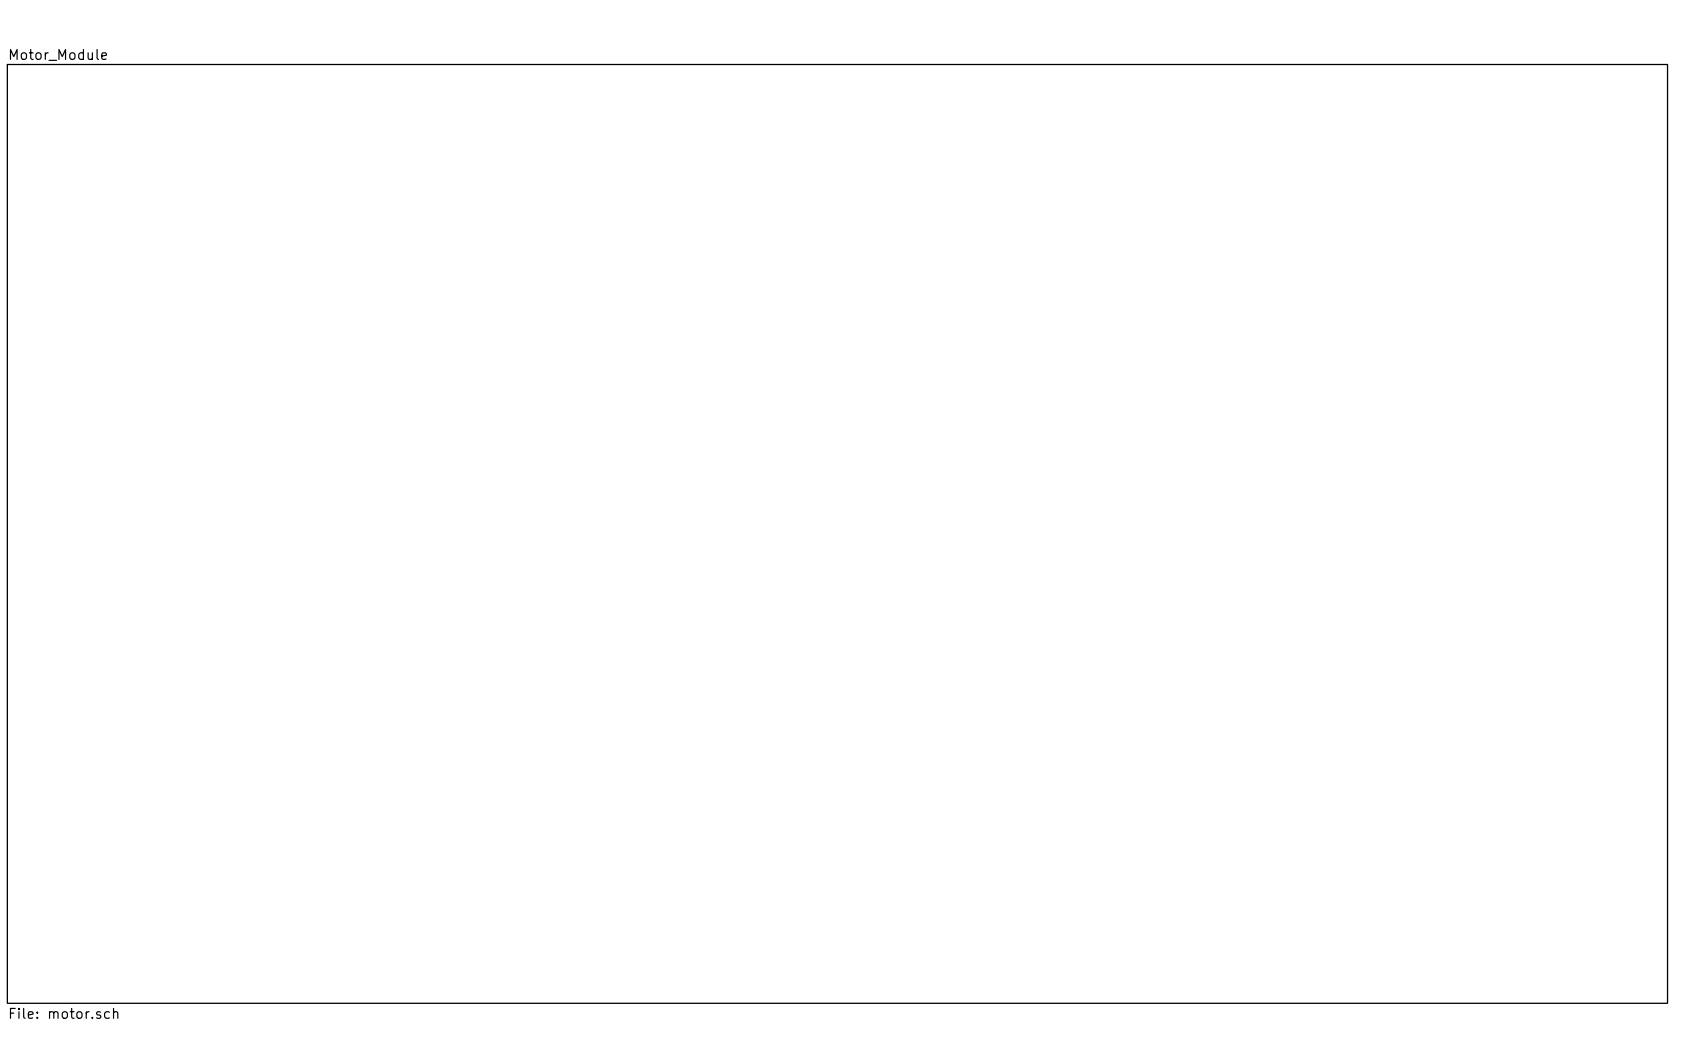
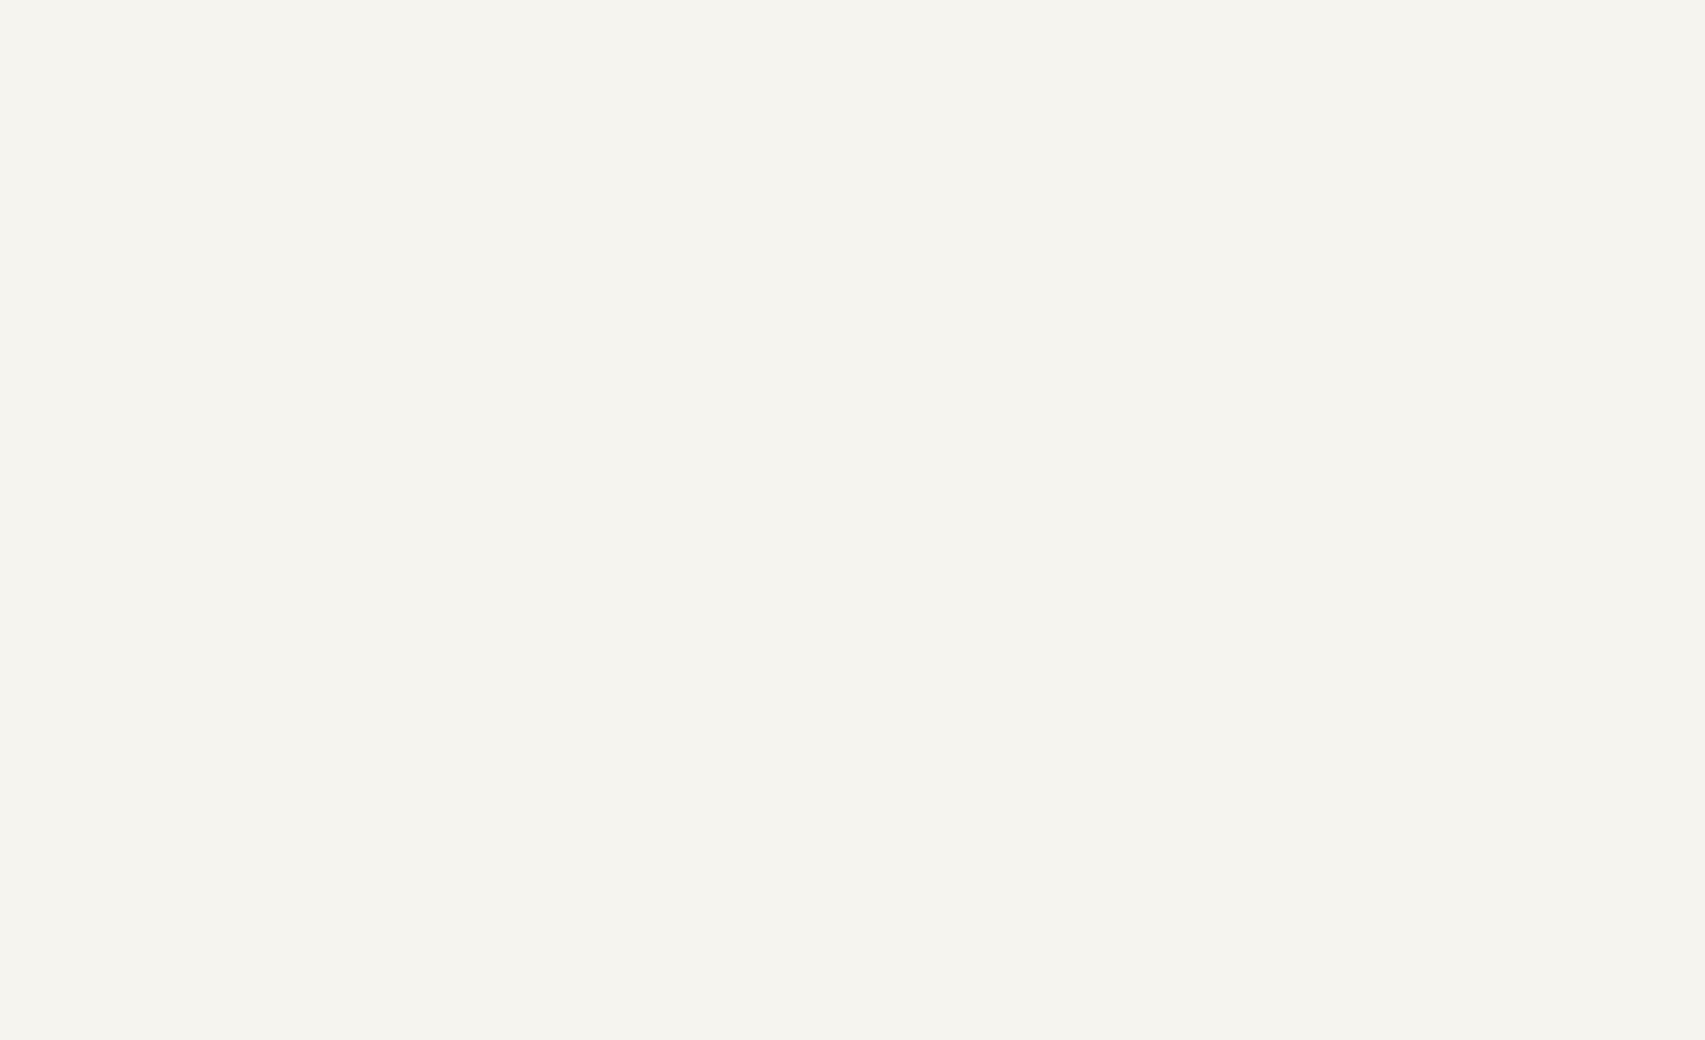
sheet Motor_Module: File: motor.sch (837, 533) -> none

